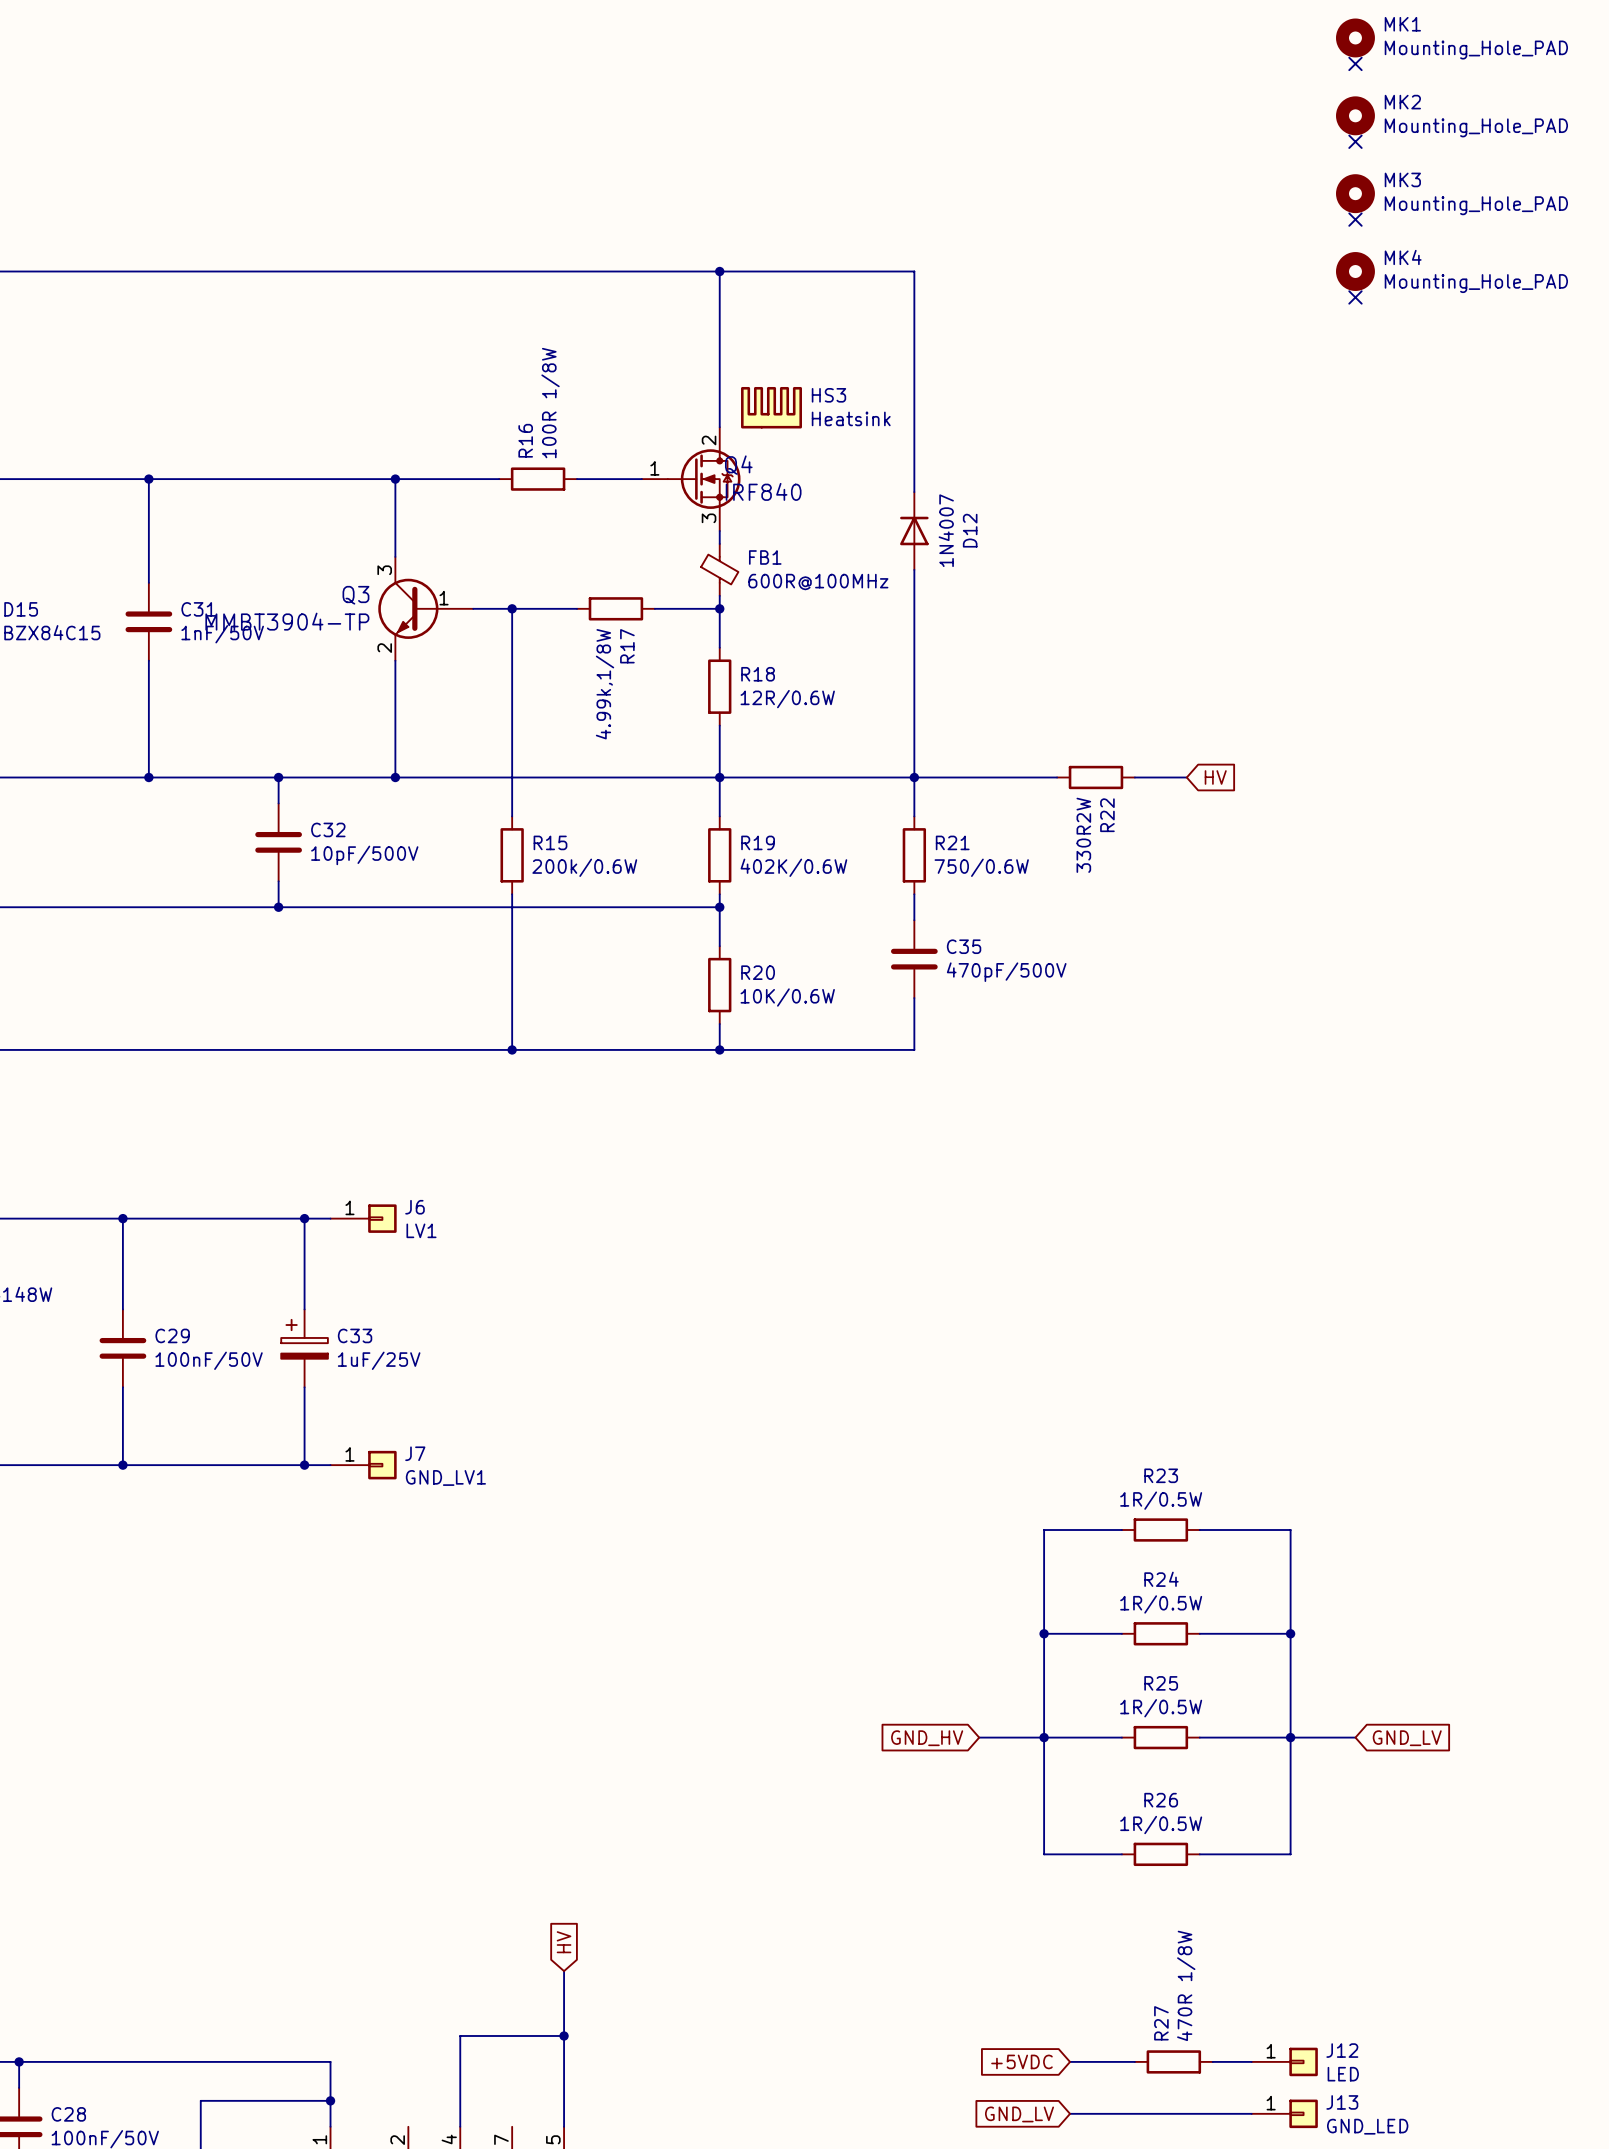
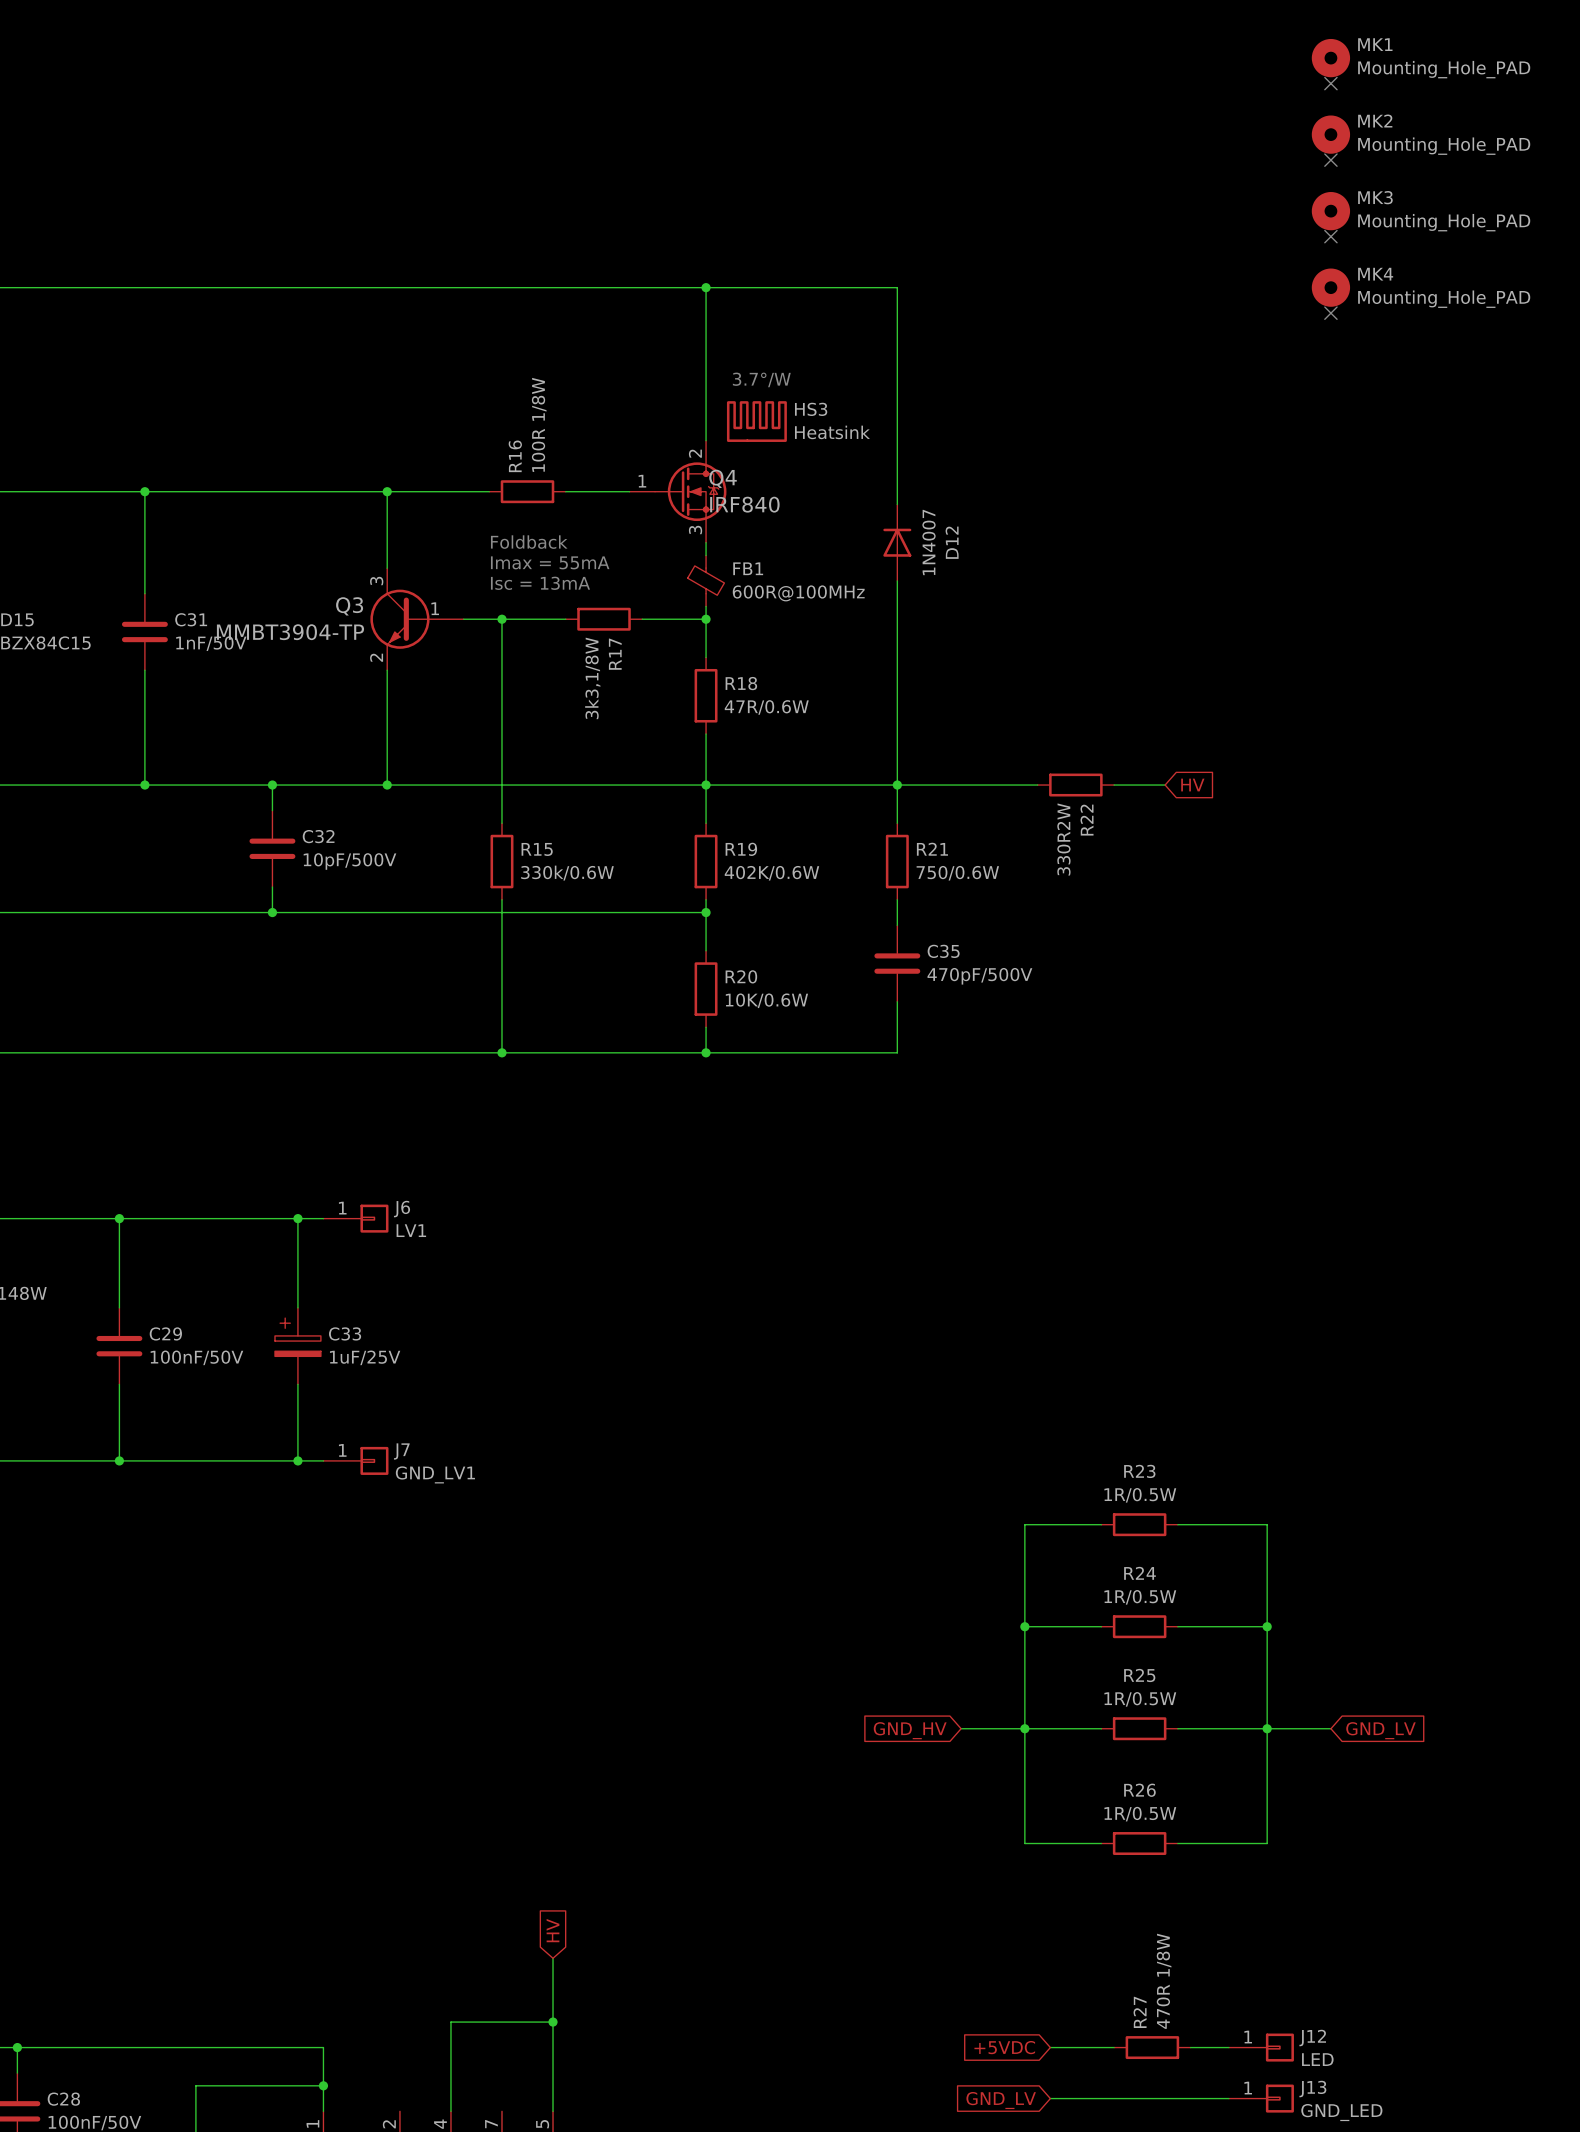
text: none -> 3.7°/W (761, 379)
text: none -> Foldback (529, 542)
text: none -> Imax = 55mA (550, 562)
text: none -> Isc = 13mA (540, 583)
R17 value: 4.99k,1/8W (605, 684) -> 3k3,1/8W (592, 678)
R18 value: 12R/0.6W (787, 699) -> 47R/0.6W (766, 707)
R15 value: 200k/0.6W (584, 867) -> 330k/0.6W (567, 873)

